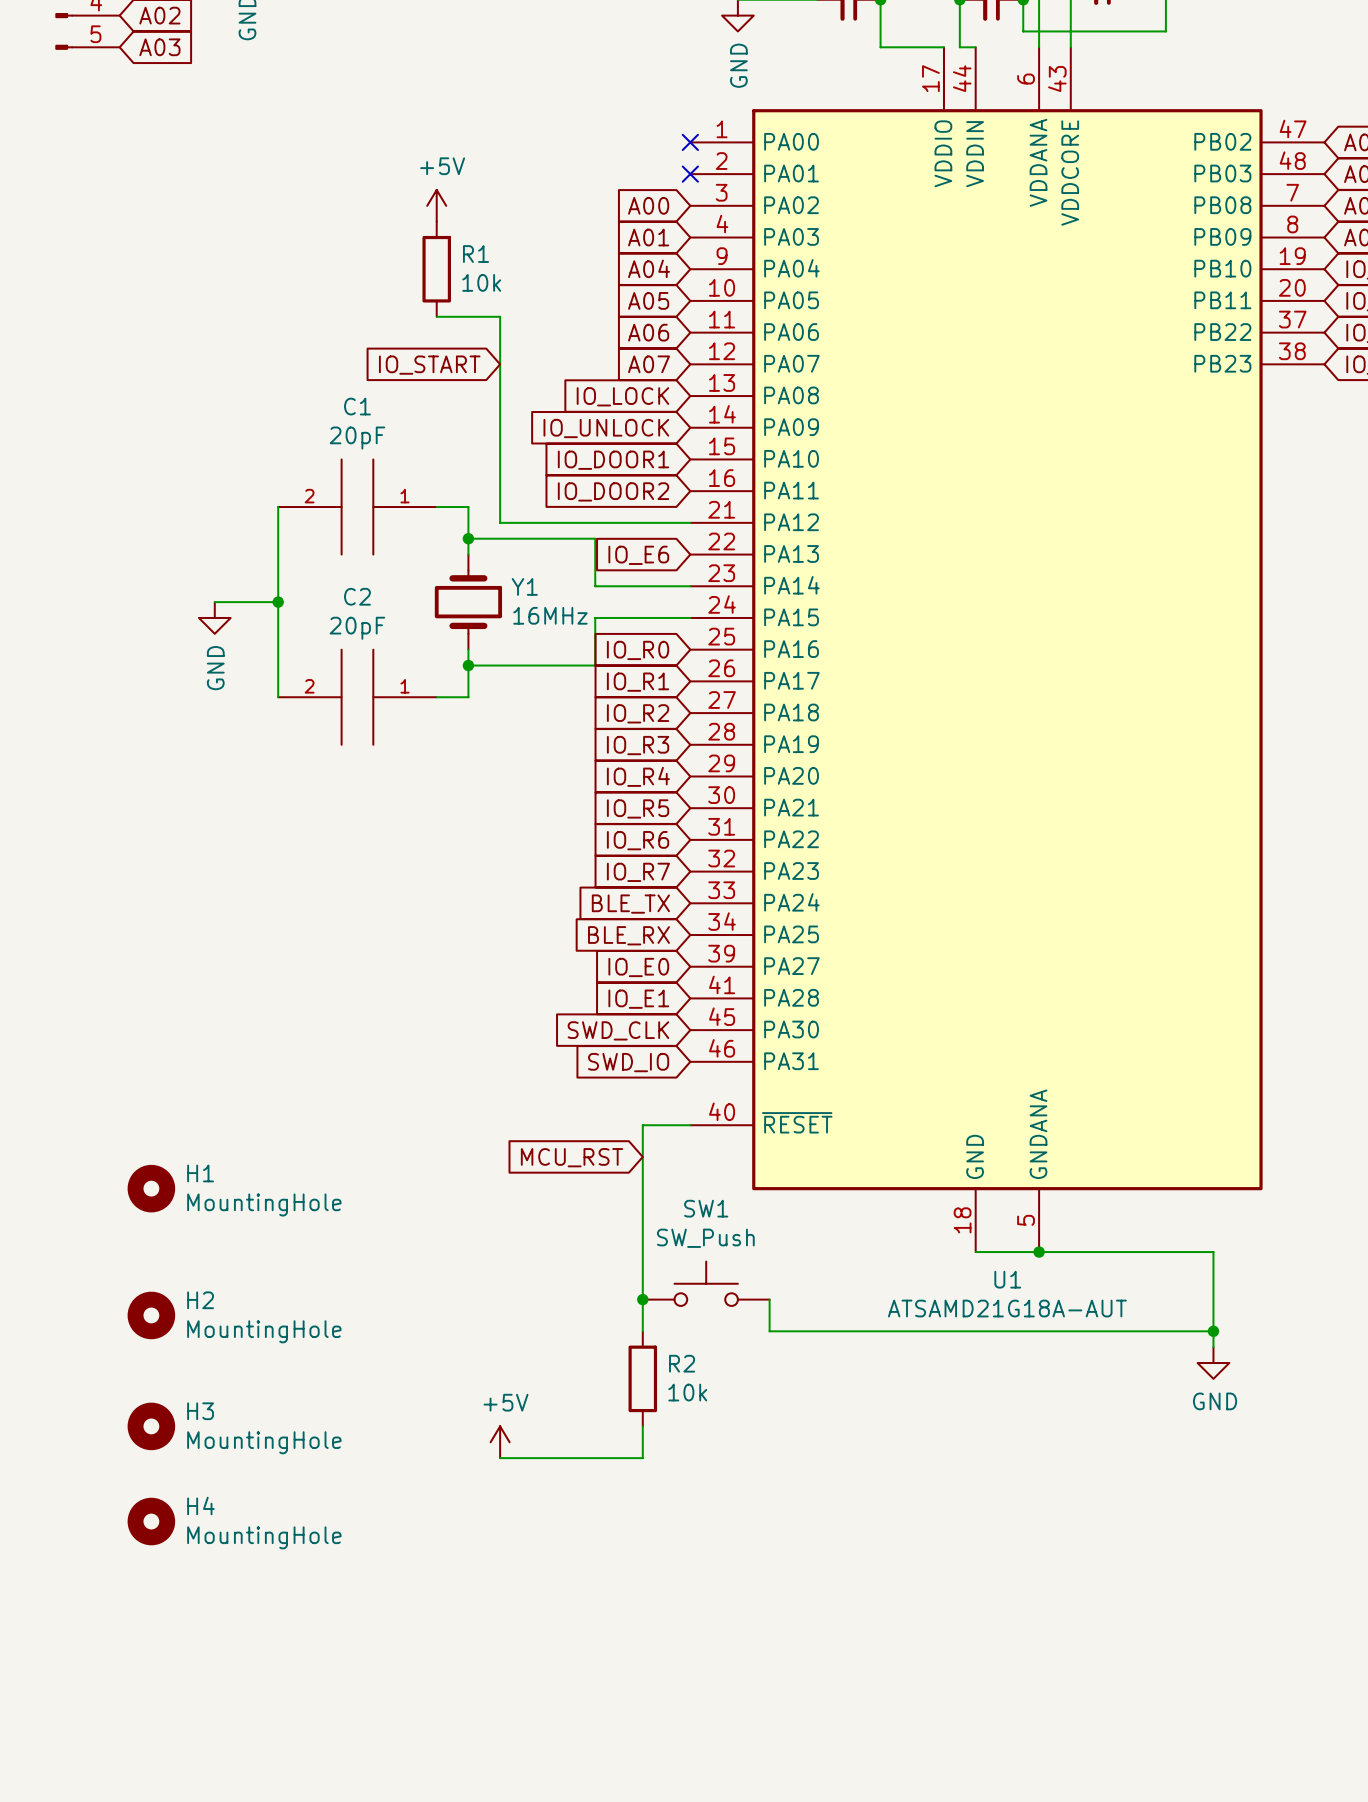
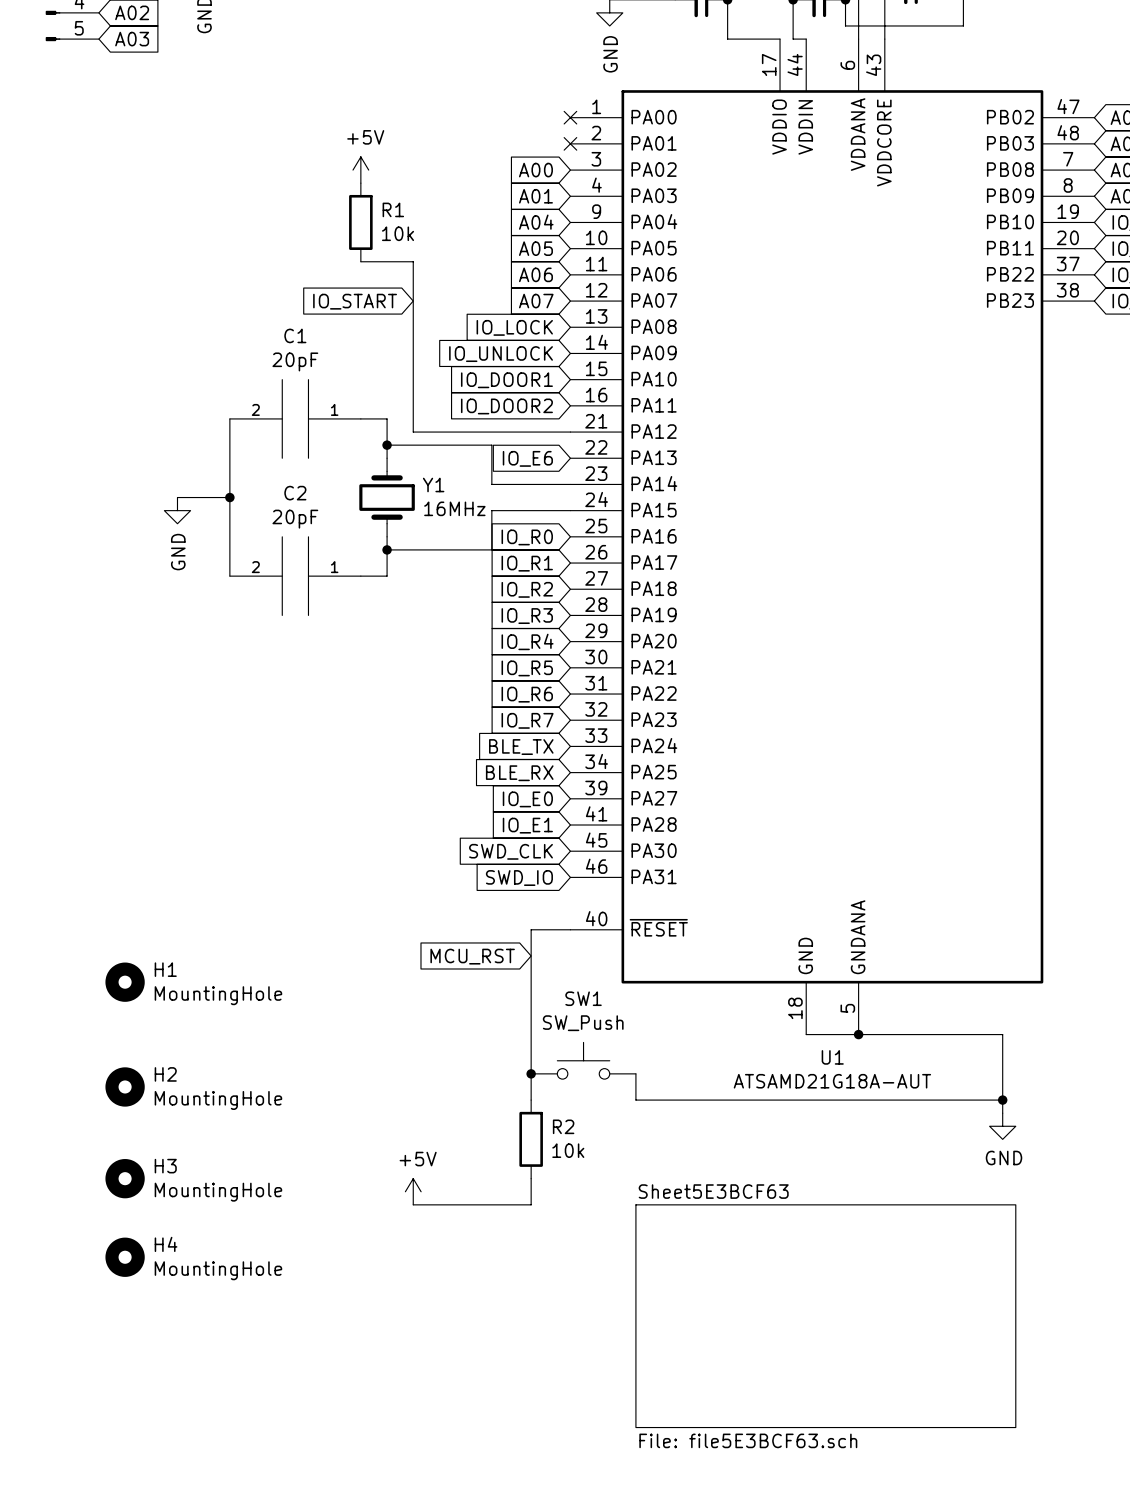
sheet Sheet5E3BCF63: none -> File: file5E3BCF63.sch (825, 1316)

